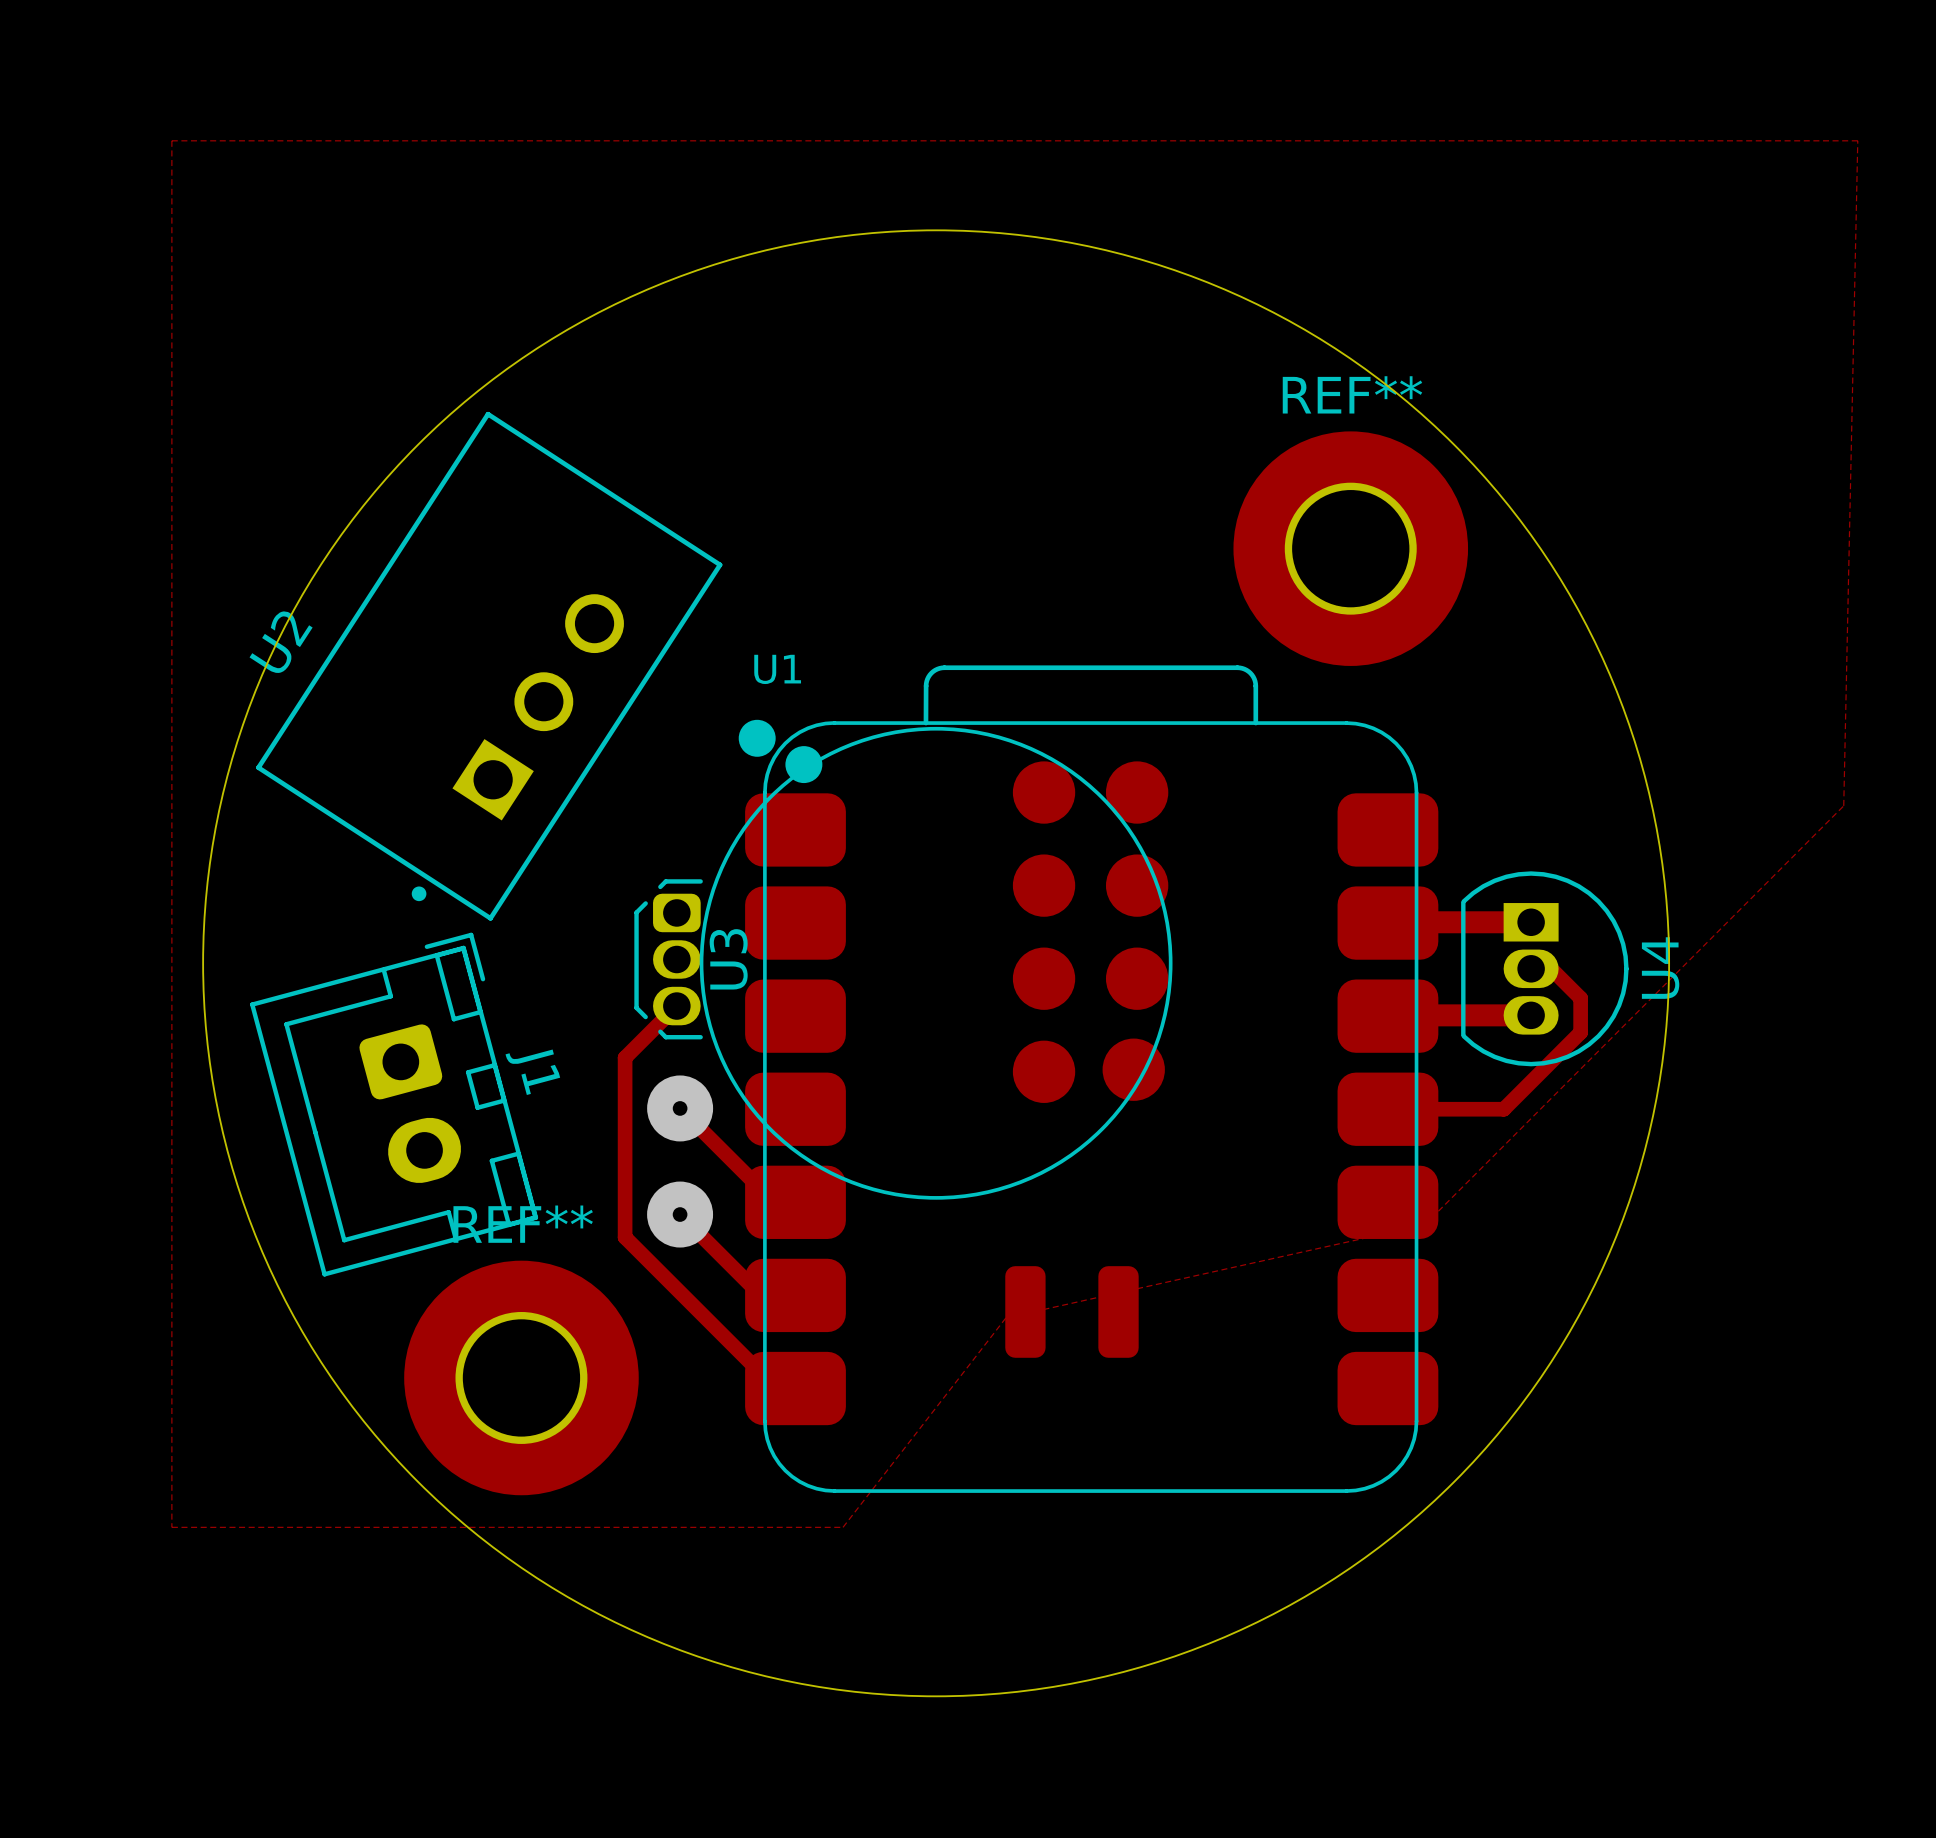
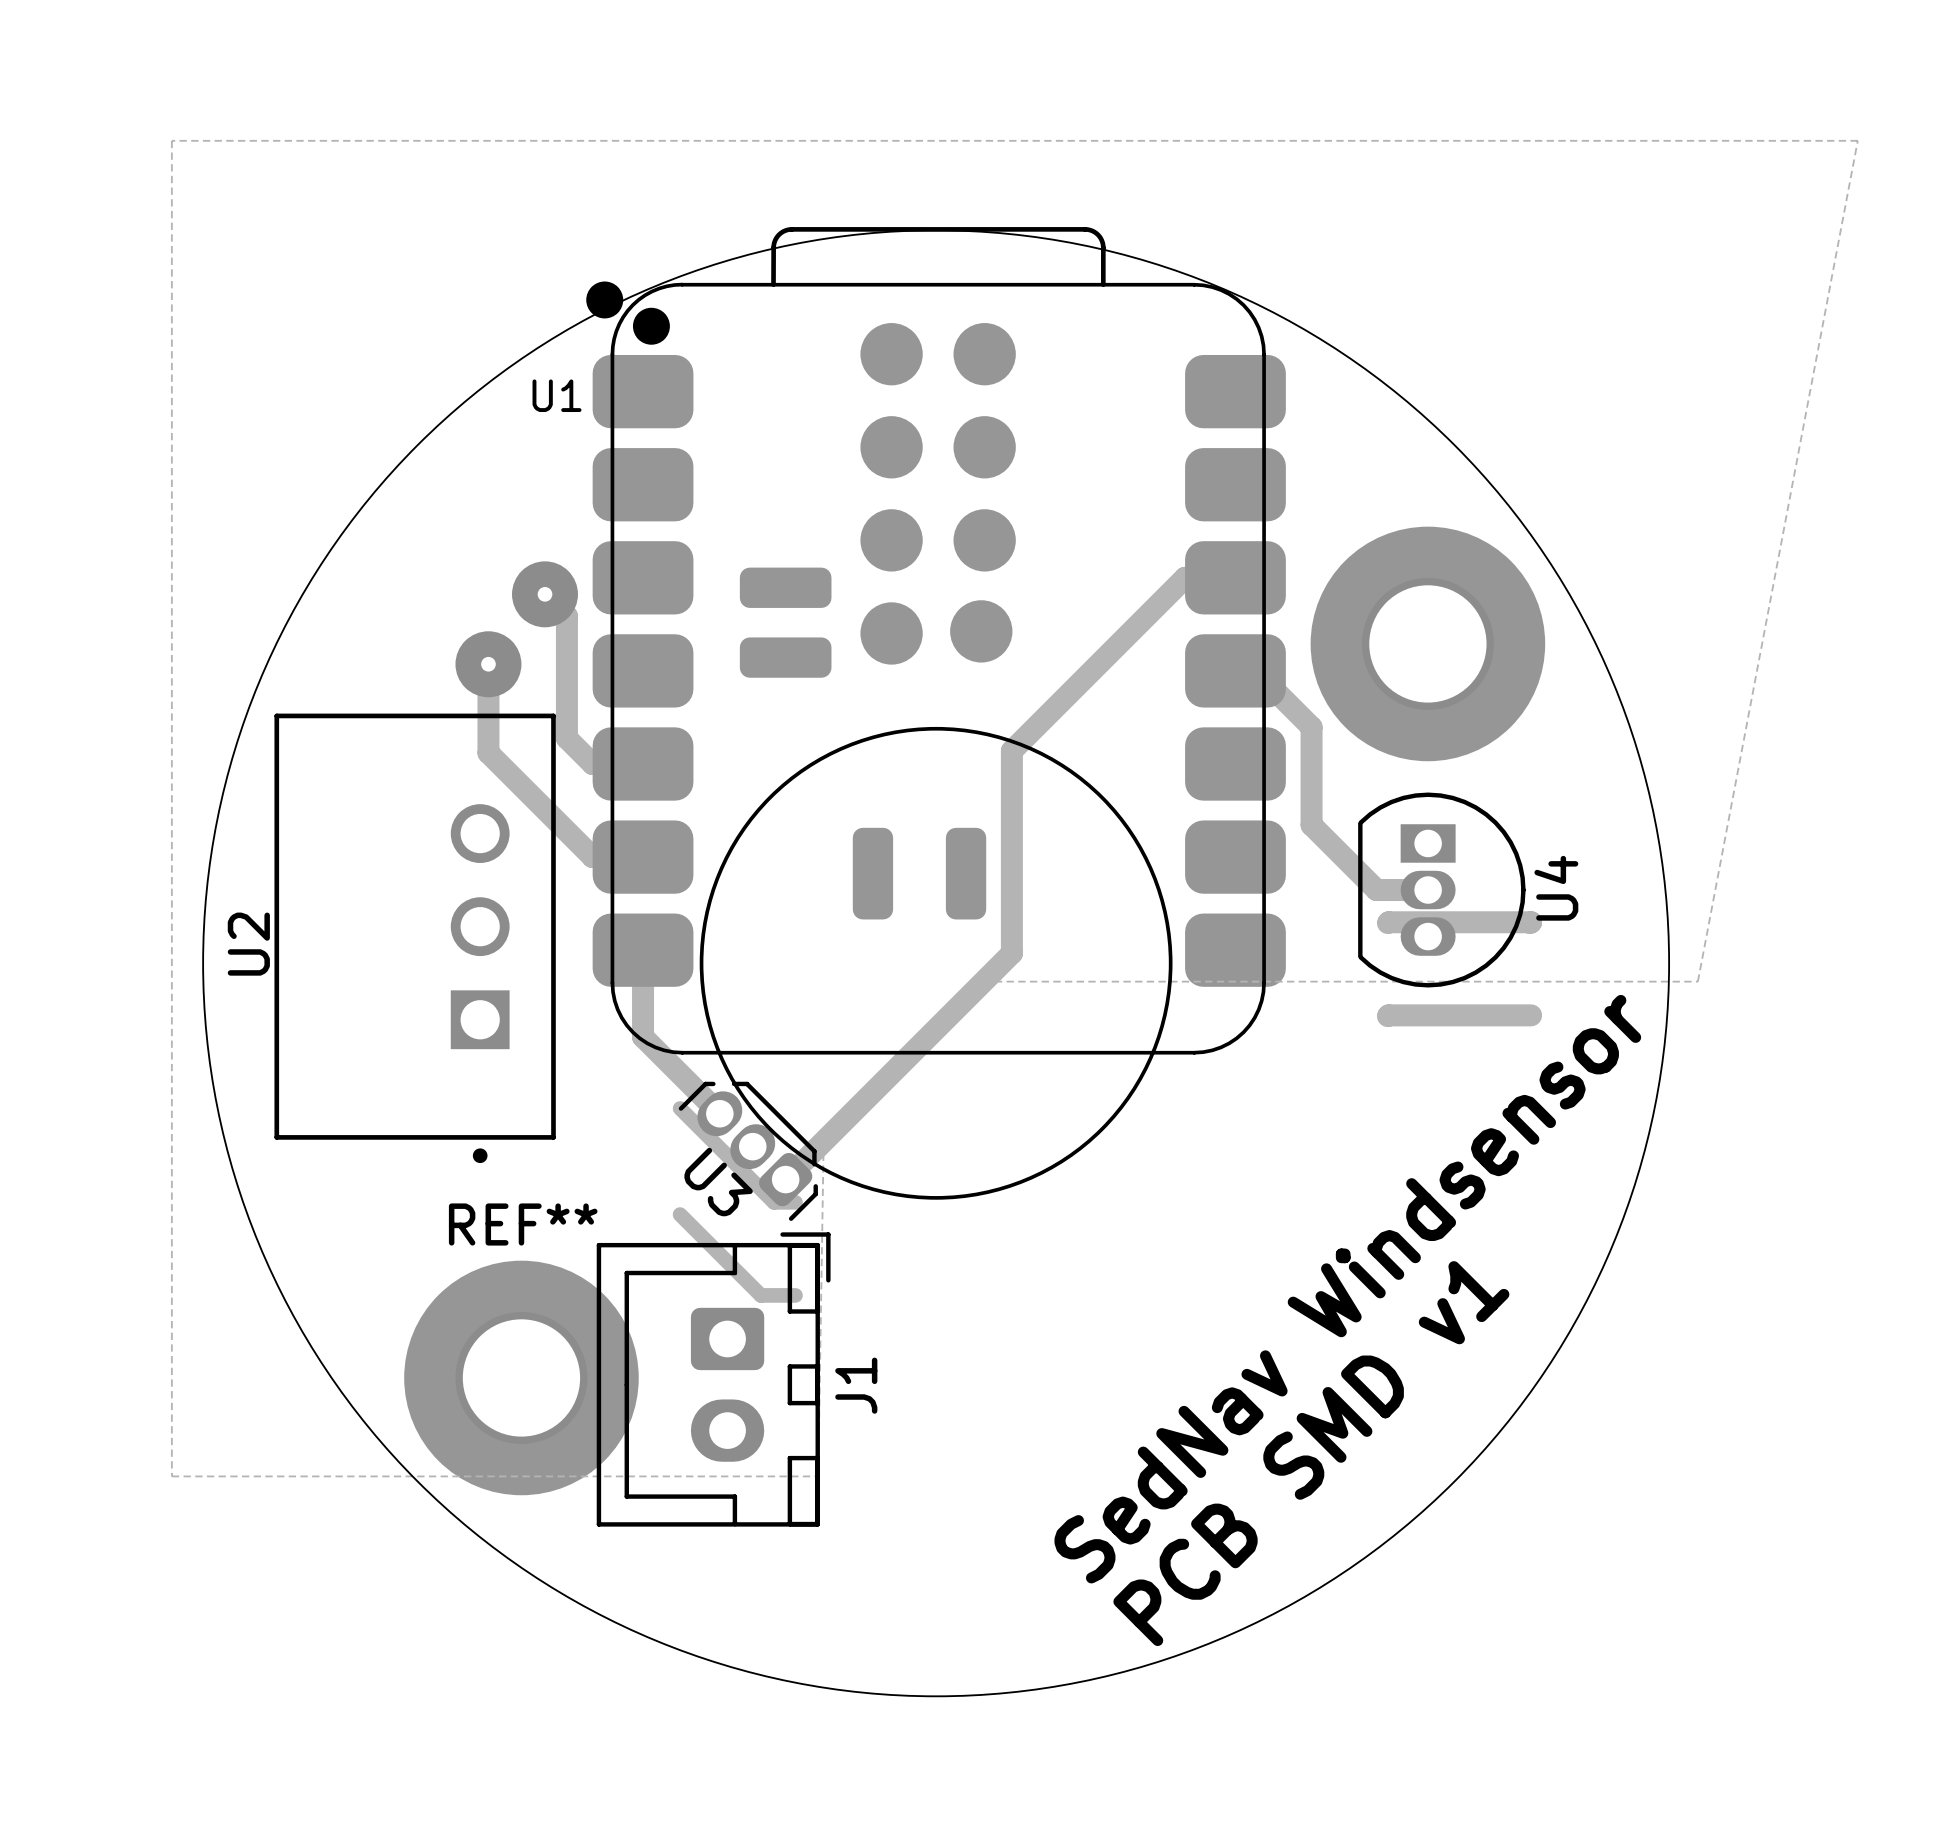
zone outline: (1857, 140) (1843, 805) (1424, 1224) (1005, 1317) (843, 1527) (171, 1527) (171, 1476) -> (1857, 140) (1697, 981) (983, 981) (823, 1128) (818, 1476) (171, 1476)
REF**: (1350, 548) -> none
track: none -> (1235, 577) (1185, 577) (1011, 751) (1011, 953) (785, 1179)
track: none -> (544, 594) (566, 616) (566, 738) (592, 763) (643, 763)
via: none -> (544, 594)
part: none -> (1427, 643)
track: none -> (488, 664) (488, 752) (592, 857) (643, 857)
via: none -> (488, 664)
U1 footprint: [738, 665, 1439, 1493] -> [586, 227, 1286, 1055]
U2 rotation: 0° (489, 666) -> 33° counterclockwise (415, 938)
U1 name position: U1 (777, 669) -> U1 (557, 395)
track: none -> (1235, 670) (1255, 670) (1311, 727) (1311, 825) (1376, 890) (1428, 890)
track: none -> (643, 950) (643, 1036) (719, 1113)
U3 rotation: 0° (668, 959) -> 135° clockwise (748, 1151)
U3 position: (668, 959) -> (748, 1151)
track: (1531, 968) (1551, 968) (1580, 998) (1580, 1032) (1503, 1109) (1387, 1109) -> none
U4 position: (1544, 968) -> (1441, 890)
track: (676, 1006) (625, 1057) (625, 1237) (776, 1388) (795, 1388) -> none
J1 rotation: 0° (394, 1104) -> 15° clockwise (713, 1379)
J1 position: (394, 1104) -> (713, 1379)
via: (680, 1108) -> none
via: (680, 1214) -> none
text: none -> SedNav Windsensor (1347, 1289)
text: none -> PCB SMD v1 (1311, 1453)

